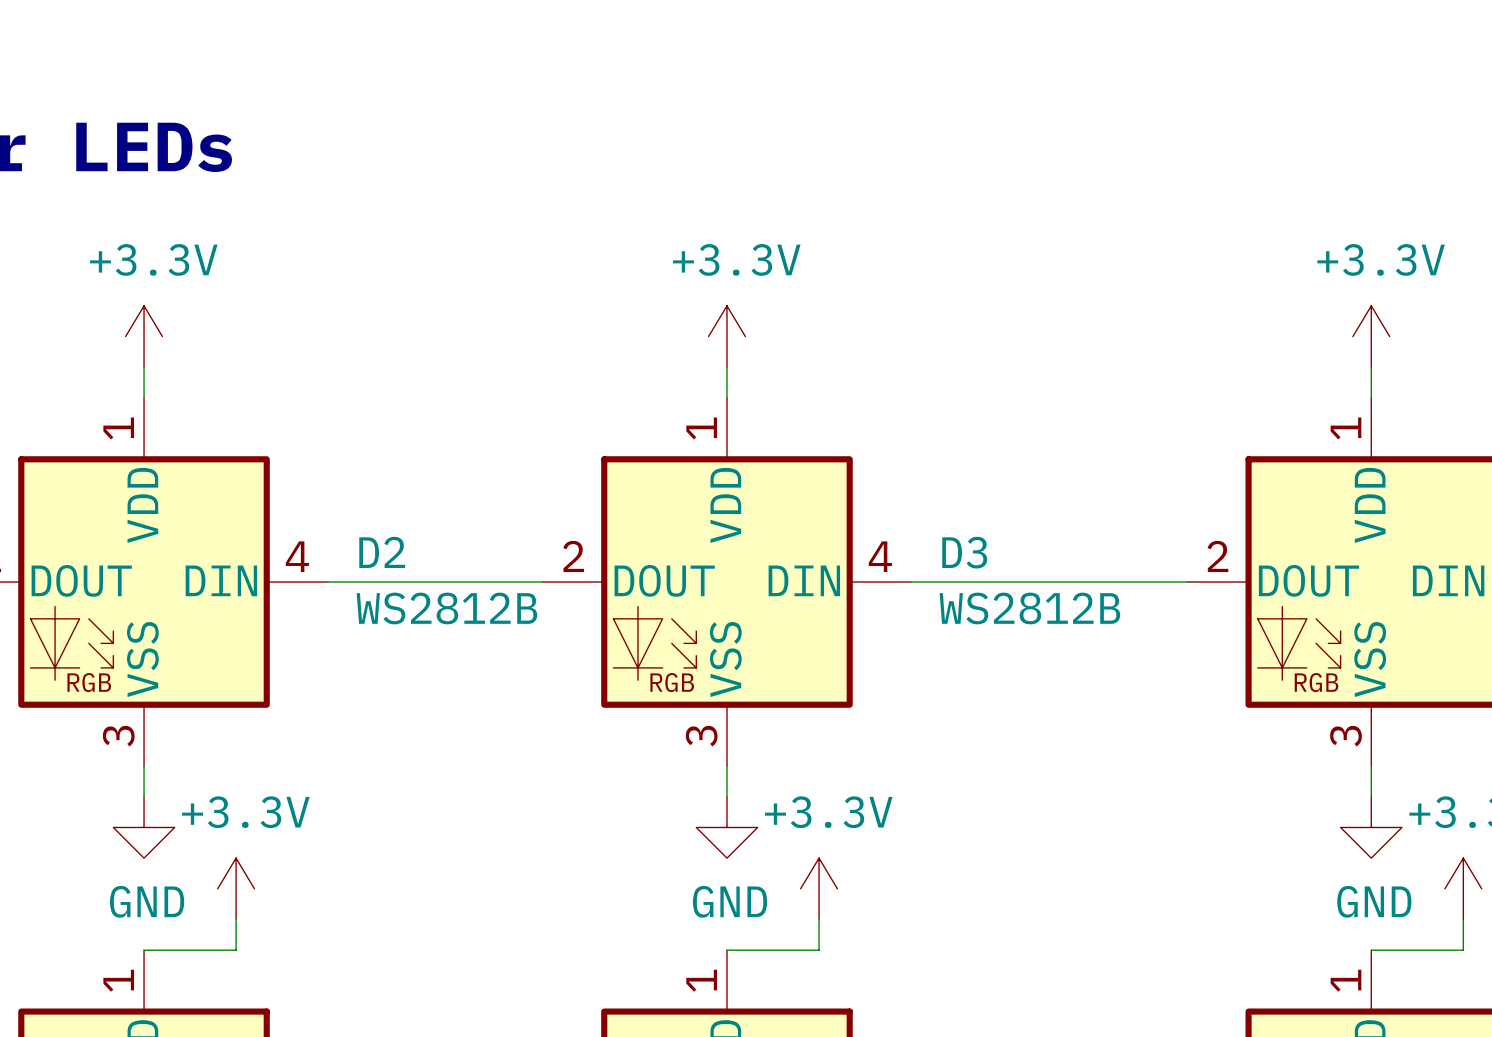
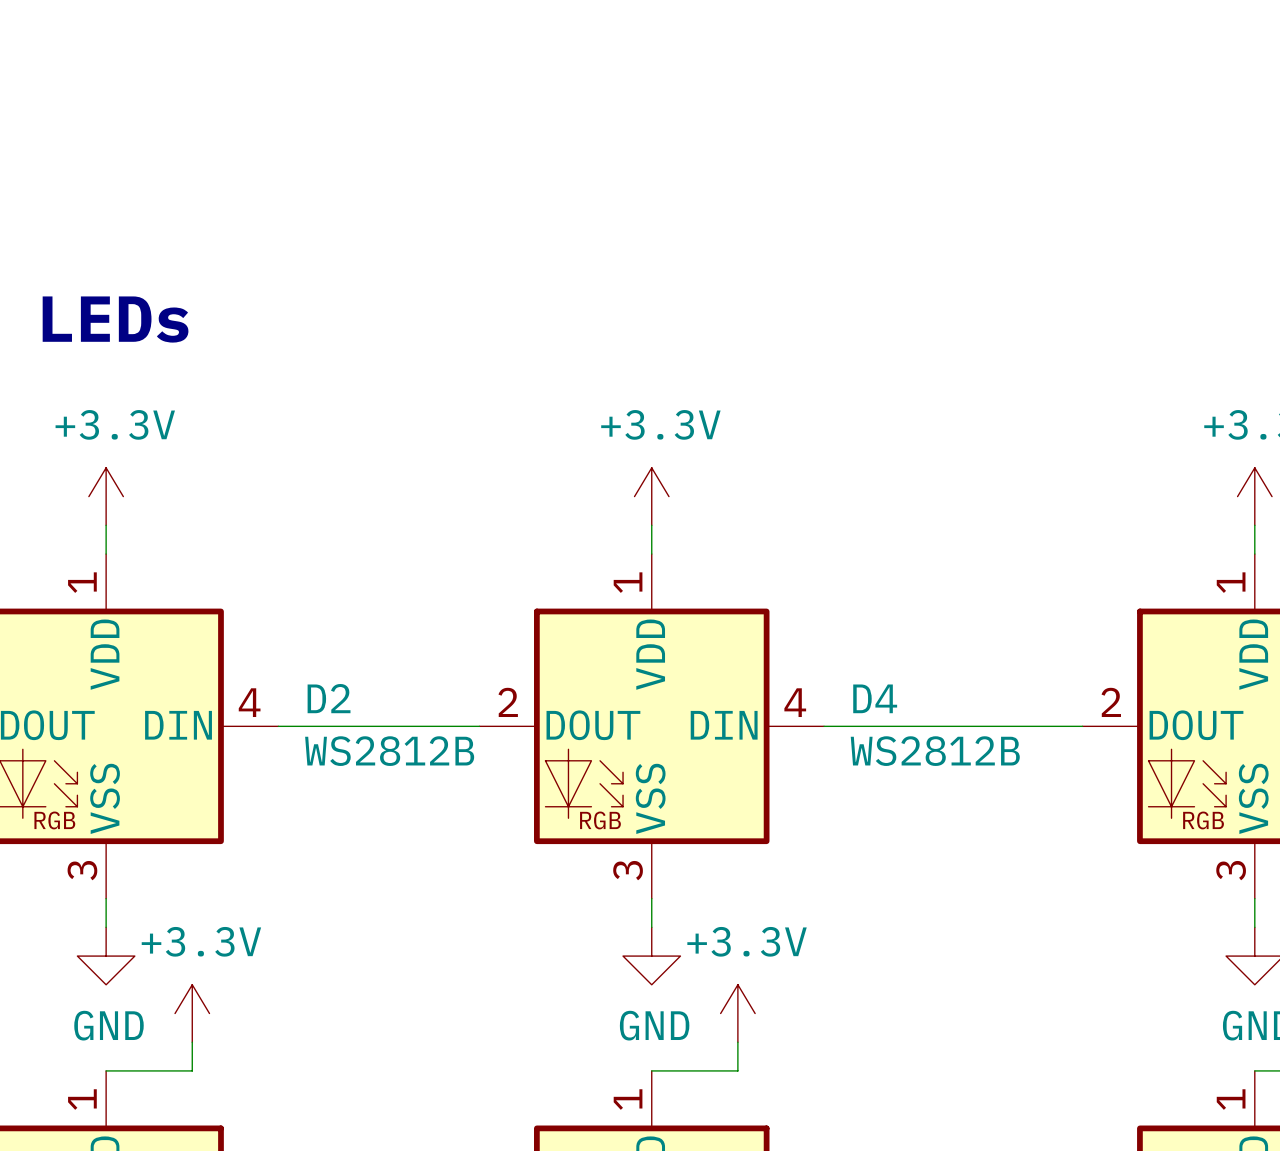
D3 name: D3 (964, 552) -> D4 (875, 698)

